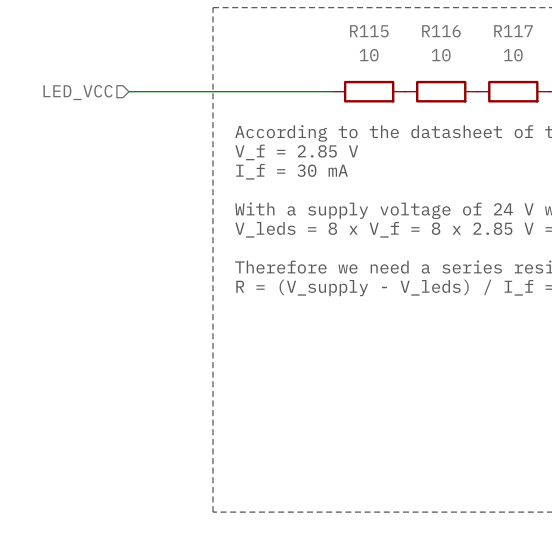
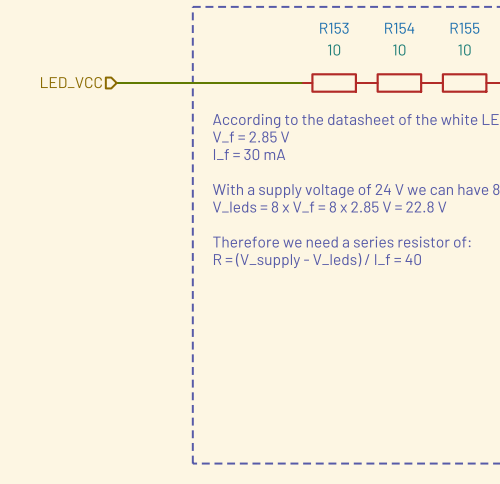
R115 name: R115 (369, 31) -> R153 (334, 28)
R116 name: R116 (441, 31) -> R154 (399, 28)
R117 name: R117 (513, 31) -> R155 (464, 28)

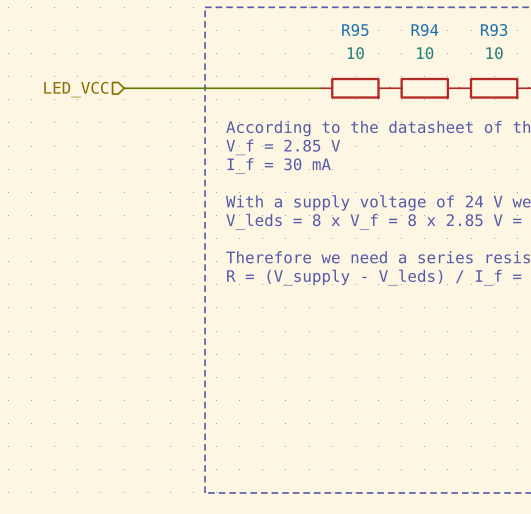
R153 name: R153 (334, 28) -> R95 (355, 30)
R154 name: R154 (399, 28) -> R94 (424, 30)
R155 name: R155 (464, 28) -> R93 (494, 30)

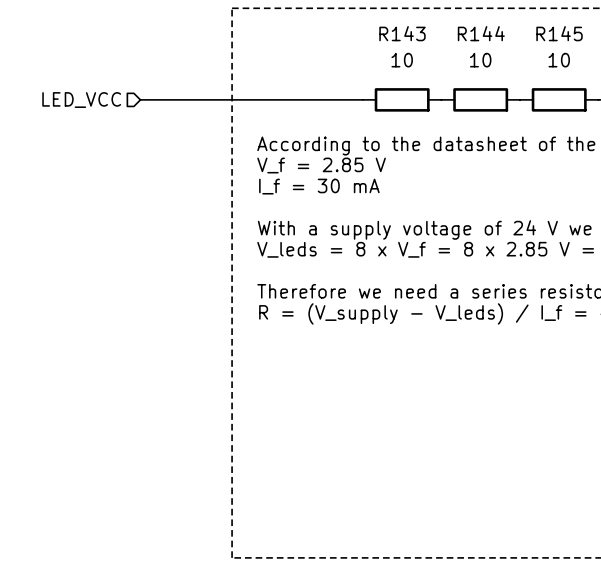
R95 name: R95 (355, 30) -> R143 (402, 33)
R94 name: R94 (424, 30) -> R144 (481, 33)
R93 name: R93 (494, 30) -> R145 (559, 33)

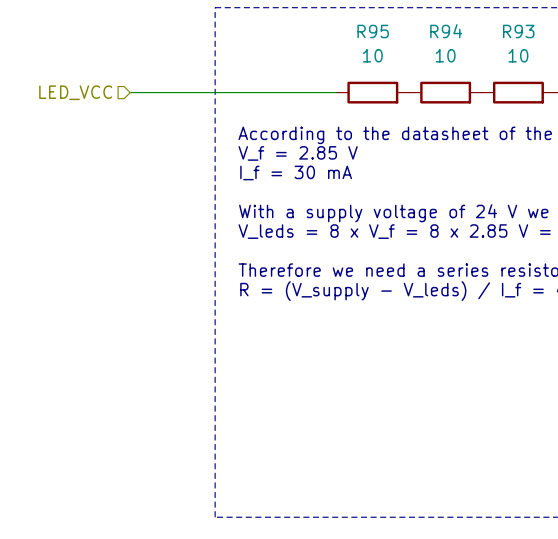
R143 name: R143 (402, 33) -> R95 (373, 31)
R144 name: R144 (481, 33) -> R94 (446, 31)
R145 name: R145 (559, 33) -> R93 (518, 31)

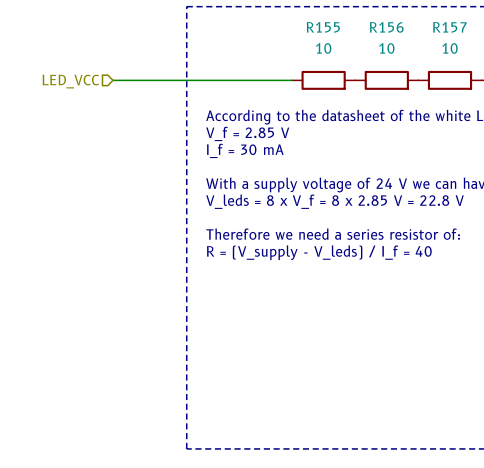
R95 name: R95 (373, 31) -> R155 (323, 27)
R94 name: R94 (446, 31) -> R156 (386, 27)
R93 name: R93 (518, 31) -> R157 (449, 27)

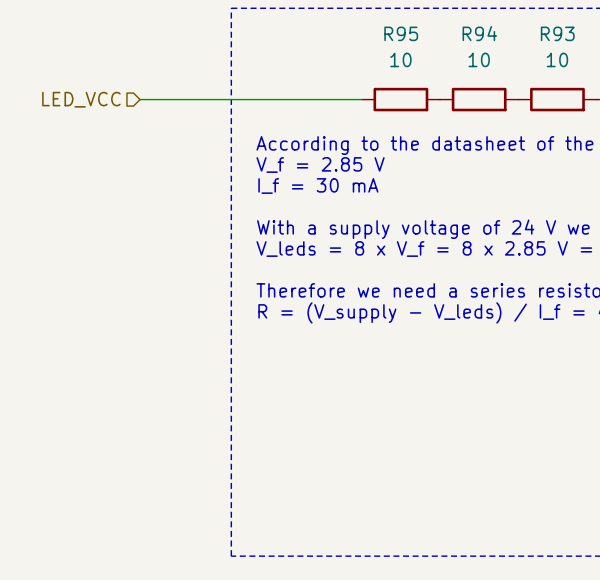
R155 name: R155 (323, 27) -> R95 (401, 33)
R156 name: R156 (386, 27) -> R94 (479, 33)
R157 name: R157 (449, 27) -> R93 (557, 33)

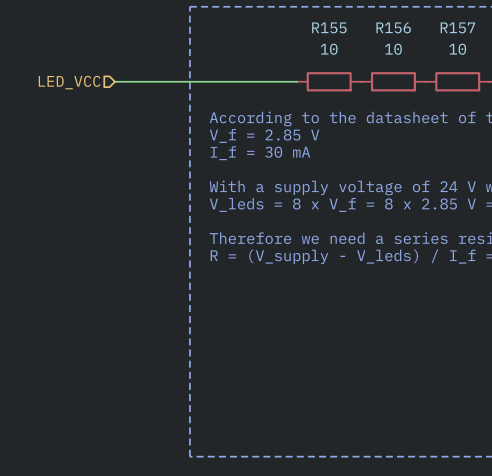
R95 name: R95 (401, 33) -> R155 (329, 27)
R94 name: R94 (479, 33) -> R156 (393, 27)
R93 name: R93 (557, 33) -> R157 (457, 27)

